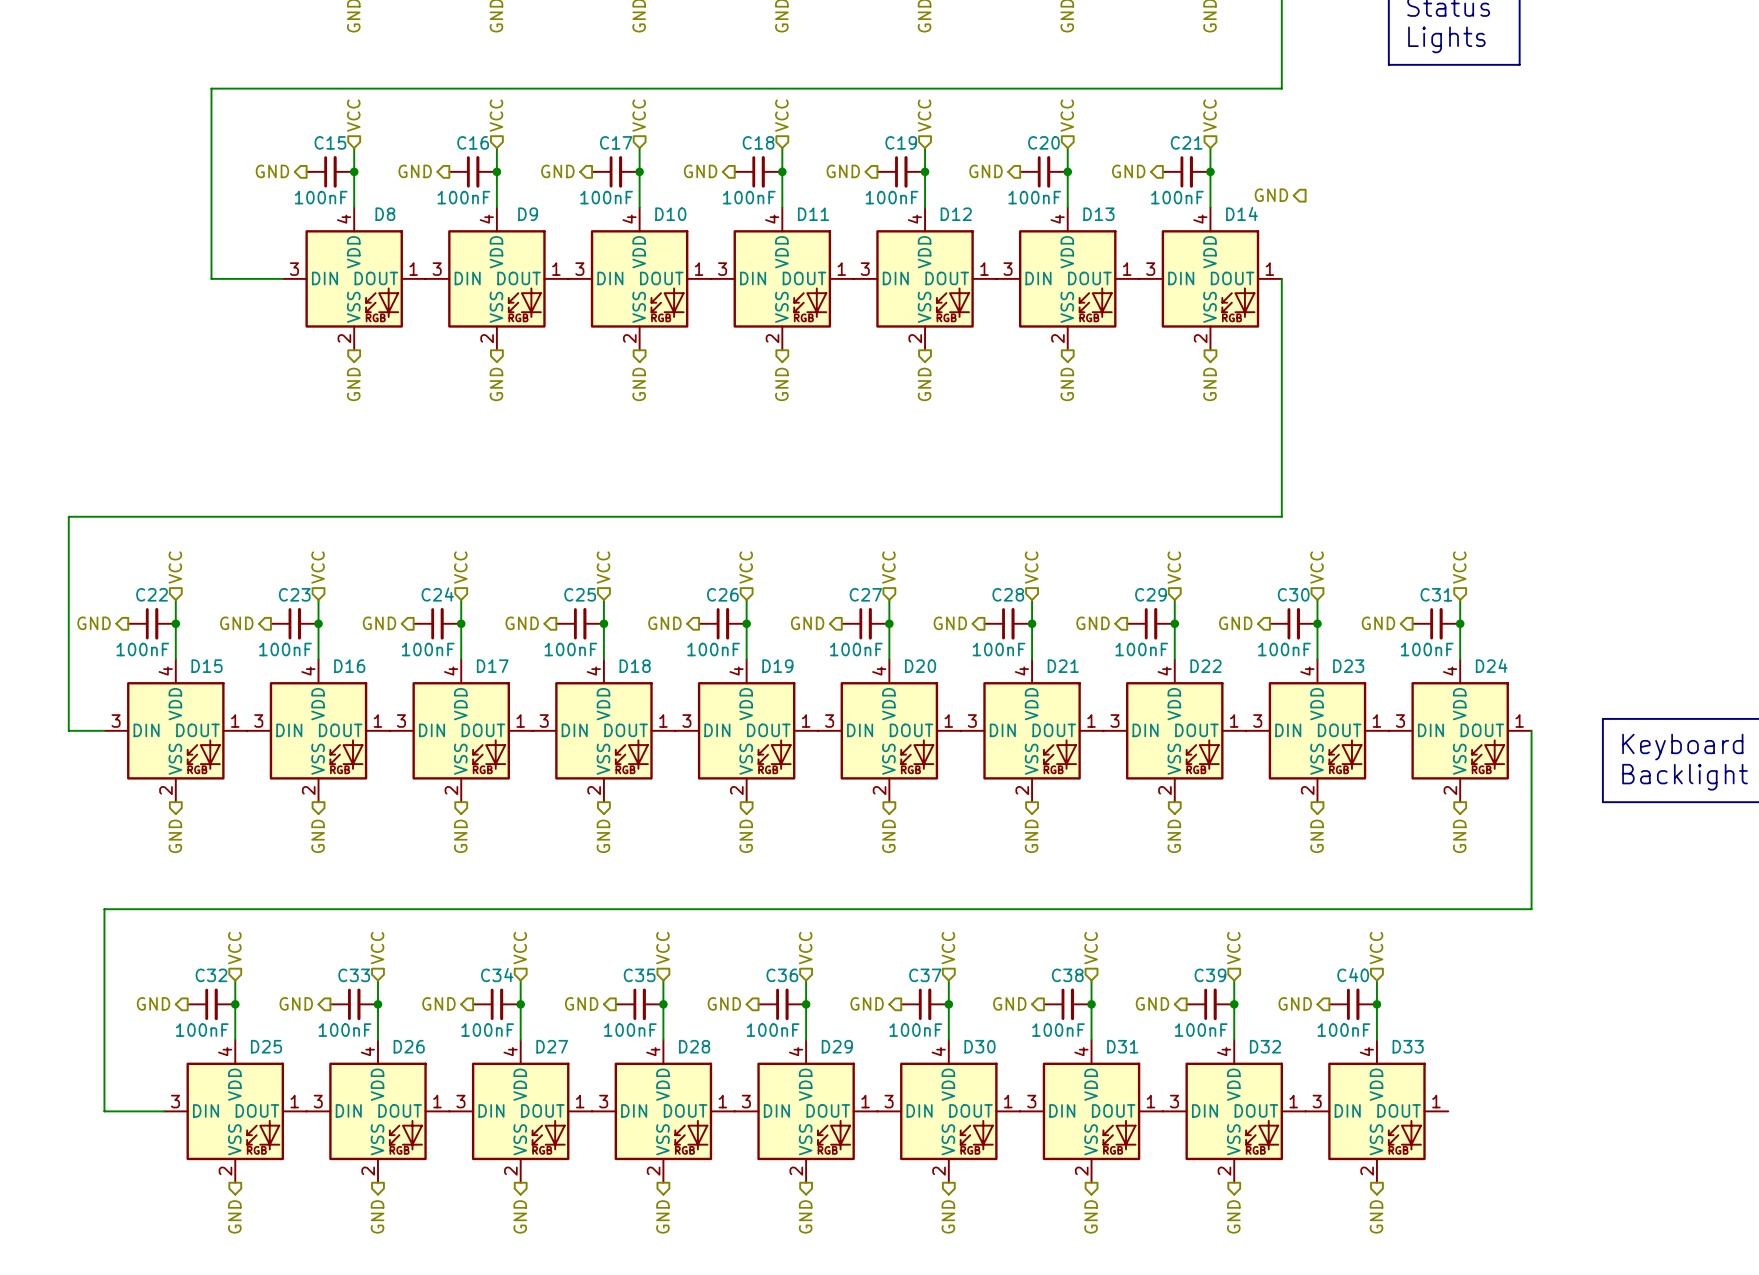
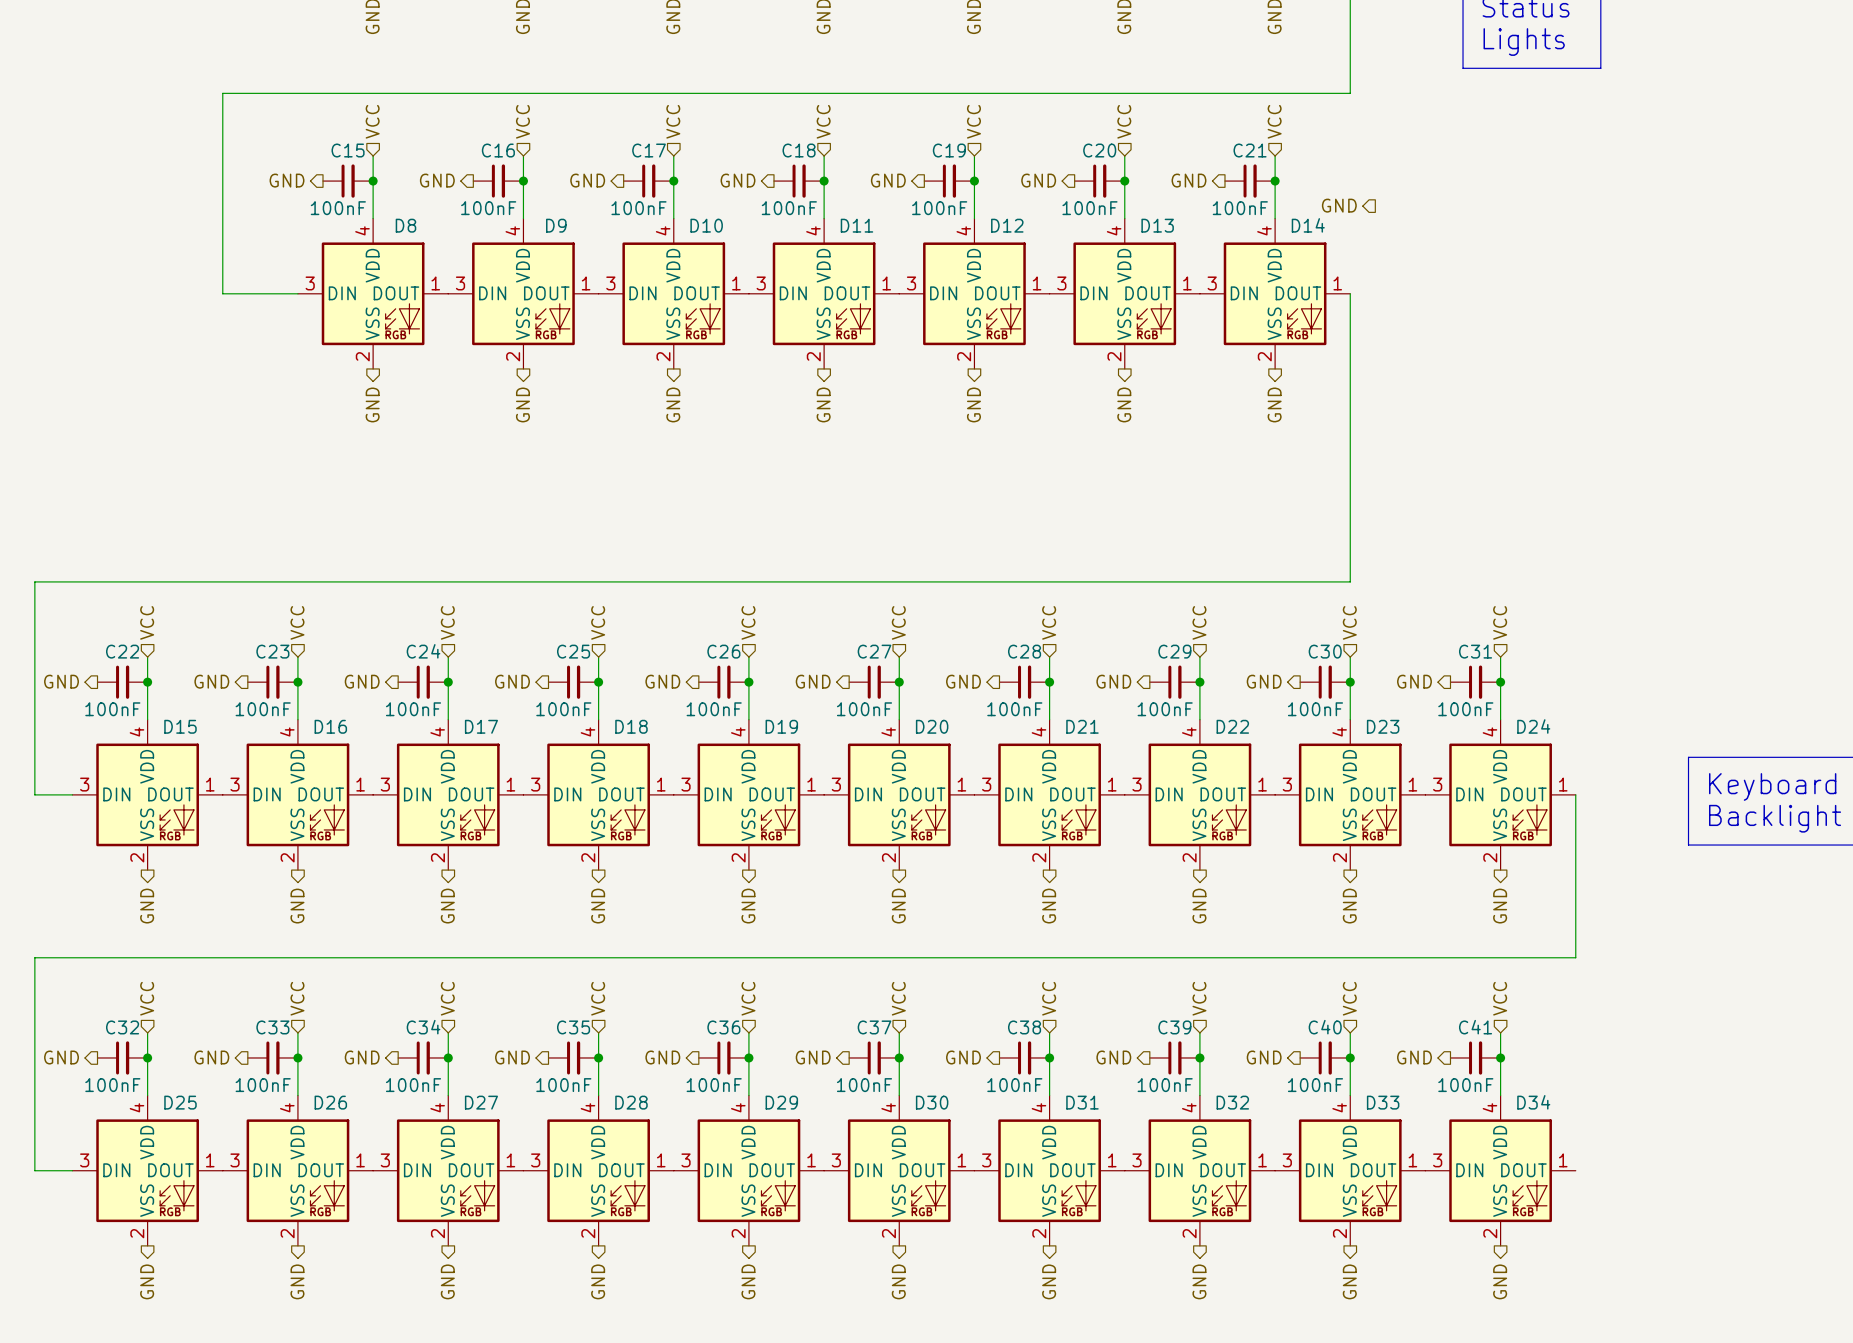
wire: (1281, 516) (68, 516) (68, 730) (104, 730) -> (1350, 544) (1350, 581) (34, 581) (34, 794) (72, 794)
hierarchical label position: VCC (175, 567) -> VCC (147, 622)
hierarchical label position: VCC (318, 567) -> VCC (297, 622)
hierarchical label position: VCC (460, 567) -> VCC (447, 622)
hierarchical label position: VCC (603, 567) -> VCC (598, 622)
hierarchical label position: VCC (746, 567) -> VCC (748, 622)
hierarchical label position: VCC (888, 567) -> VCC (898, 622)
hierarchical label position: VCC (1031, 567) -> VCC (1049, 622)
hierarchical label position: VCC (1174, 567) -> VCC (1199, 622)
hierarchical label position: VCC (1317, 567) -> VCC (1349, 622)
hierarchical label position: VCC (1459, 567) -> VCC (1500, 622)
wire: (175, 600) (175, 659) -> (147, 657) (147, 719)
wire: (318, 600) (318, 659) -> (297, 657) (297, 719)
wire: (461, 600) (461, 659) -> (448, 657) (448, 719)
wire: (603, 600) (603, 659) -> (598, 657) (598, 719)
wire: (746, 600) (746, 659) -> (748, 657) (748, 719)
wire: (889, 600) (889, 659) -> (899, 657) (899, 719)
wire: (1032, 600) (1032, 659) -> (1049, 657) (1049, 719)
wire: (1174, 600) (1174, 659) -> (1199, 657) (1199, 719)
wire: (1317, 600) (1317, 659) -> (1350, 657) (1350, 719)
wire: (1460, 600) (1460, 659) -> (1500, 657) (1500, 719)
hierarchical label position: GND (94, 623) -> GND (61, 681)
C22 position: (152, 623) -> (122, 682)
junction position: (175, 623) -> (147, 682)
hierarchical label position: GND (236, 623) -> GND (211, 681)
C23 position: (294, 623) -> (272, 682)
junction position: (318, 623) -> (297, 682)
hierarchical label position: GND (379, 623) -> GND (362, 681)
C24 position: (437, 623) -> (423, 682)
junction position: (461, 623) -> (448, 682)
hierarchical label position: GND (522, 623) -> GND (512, 681)
C25 position: (580, 623) -> (573, 682)
junction position: (603, 623) -> (598, 682)
hierarchical label position: GND (664, 623) -> GND (662, 681)
C26 position: (722, 623) -> (723, 682)
junction position: (746, 623) -> (748, 682)
hierarchical label position: GND (807, 623) -> GND (813, 681)
C27 position: (865, 623) -> (874, 682)
junction position: (889, 623) -> (899, 682)
hierarchical label position: GND (950, 623) -> GND (963, 681)
C28 position: (1008, 623) -> (1024, 682)
junction position: (1032, 623) -> (1049, 682)
hierarchical label position: GND (1093, 623) -> GND (1113, 681)
C29 position: (1150, 623) -> (1174, 682)
junction position: (1174, 623) -> (1199, 682)
hierarchical label position: GND (1235, 623) -> GND (1264, 681)
C30 position: (1293, 623) -> (1325, 682)
junction position: (1317, 623) -> (1350, 682)
hierarchical label position: GND (1378, 623) -> GND (1414, 681)
C31 position: (1436, 623) -> (1475, 682)
junction position: (1460, 623) -> (1500, 682)
D15 position: (175, 730) -> (147, 794)
D16 position: (318, 730) -> (297, 794)
D17 position: (461, 730) -> (448, 794)
D18 position: (603, 730) -> (598, 794)
D19 position: (746, 730) -> (748, 794)
D20 position: (889, 730) -> (899, 794)
D21 position: (1032, 730) -> (1049, 794)
D22 position: (1174, 730) -> (1199, 794)
D23 position: (1317, 730) -> (1350, 794)
D24 position: (1460, 730) -> (1500, 794)
wire: (1531, 730) (1531, 909) (1495, 909) -> (1575, 794) (1575, 957)
hierarchical label position: GND (175, 836) -> GND (147, 906)
hierarchical label position: GND (318, 836) -> GND (297, 906)
hierarchical label position: GND (460, 836) -> GND (447, 906)
hierarchical label position: GND (603, 836) -> GND (598, 906)
hierarchical label position: GND (746, 836) -> GND (748, 906)
hierarchical label position: GND (888, 836) -> GND (898, 906)
hierarchical label position: GND (1031, 836) -> GND (1049, 906)
hierarchical label position: GND (1174, 836) -> GND (1199, 906)
hierarchical label position: GND (1317, 836) -> GND (1349, 906)
hierarchical label position: GND (1459, 836) -> GND (1500, 906)
wire: (104, 909) (104, 1111) (163, 1111) -> (110, 957) (34, 957) (34, 1170) (72, 1170)
hierarchical label: none -> VCC (147, 998)
hierarchical label: VCC (234, 948) -> none
hierarchical label: none -> VCC (297, 998)
hierarchical label: VCC (377, 948) -> none
hierarchical label: none -> VCC (447, 998)
hierarchical label: VCC (520, 948) -> none
hierarchical label: none -> VCC (598, 998)
hierarchical label: VCC (662, 948) -> none
hierarchical label: none -> VCC (748, 998)
hierarchical label: VCC (805, 948) -> none
hierarchical label: none -> VCC (898, 998)
hierarchical label: VCC (948, 948) -> none
hierarchical label: none -> VCC (1049, 998)
hierarchical label: VCC (1091, 948) -> none
hierarchical label: none -> VCC (1199, 998)
hierarchical label: VCC (1233, 948) -> none
hierarchical label: none -> VCC (1349, 998)
hierarchical label: VCC (1376, 948) -> none
hierarchical label: none -> VCC (1500, 998)
wire: none -> (147, 1032) (147, 1095)
wire: (235, 980) (235, 1040) -> (297, 1032) (297, 1095)
wire: (377, 980) (377, 1040) -> (448, 1032) (448, 1095)
wire: (520, 980) (520, 1040) -> (598, 1032) (598, 1095)
wire: (663, 980) (663, 1040) -> (748, 1032) (748, 1095)
wire: (806, 980) (806, 1040) -> (899, 1032) (899, 1095)
wire: (948, 980) (948, 1040) -> (1049, 1032) (1049, 1095)
wire: (1091, 980) (1091, 1040) -> (1199, 1032) (1199, 1095)
wire: (1234, 980) (1234, 1040) -> (1350, 1032) (1350, 1095)
wire: (1376, 980) (1376, 1040) -> (1500, 1032) (1500, 1095)
hierarchical label: none -> GND (61, 1057)
hierarchical label: GND (153, 1003) -> none
hierarchical label: none -> GND (211, 1057)
hierarchical label: GND (296, 1003) -> none
hierarchical label: none -> GND (362, 1057)
hierarchical label: GND (438, 1003) -> none
hierarchical label: none -> GND (512, 1057)
hierarchical label: GND (581, 1003) -> none
hierarchical label: none -> GND (662, 1057)
hierarchical label: GND (724, 1003) -> none
hierarchical label: none -> GND (813, 1057)
hierarchical label: GND (867, 1003) -> none
hierarchical label: none -> GND (963, 1057)
hierarchical label: GND (1009, 1003) -> none
hierarchical label: none -> GND (1113, 1057)
hierarchical label: GND (1152, 1003) -> none
hierarchical label: none -> GND (1264, 1057)
hierarchical label: GND (1295, 1003) -> none
hierarchical label: none -> GND (1414, 1057)
junction: none -> (147, 1057)
C32 position: (211, 1004) -> (122, 1057)
junction: (235, 1004) -> none
junction: none -> (297, 1057)
C33 position: (354, 1004) -> (272, 1057)
junction: (377, 1004) -> none
junction: none -> (448, 1057)
C34 position: (496, 1004) -> (423, 1057)
junction: (520, 1004) -> none
junction: none -> (598, 1057)
C35 position: (639, 1004) -> (573, 1057)
junction: (663, 1004) -> none
junction: none -> (748, 1057)
C36 position: (782, 1004) -> (723, 1057)
junction: (806, 1004) -> none
junction: none -> (899, 1057)
C37 position: (925, 1004) -> (874, 1057)
junction: (948, 1004) -> none
junction: none -> (1049, 1057)
C38 position: (1067, 1004) -> (1024, 1057)
junction: (1091, 1004) -> none
junction: none -> (1199, 1057)
C39 position: (1210, 1004) -> (1174, 1057)
junction: (1234, 1004) -> none
junction: none -> (1350, 1057)
C40 position: (1353, 1004) -> (1325, 1057)
junction: (1376, 1004) -> none
C41: none -> 100nF (1475, 1057)
junction: none -> (1500, 1057)
D25 position: (235, 1111) -> (147, 1170)
D26 position: (377, 1111) -> (297, 1170)
D27 position: (520, 1111) -> (448, 1170)
D28 position: (663, 1111) -> (598, 1170)
D29 position: (806, 1111) -> (748, 1170)
D30 position: (948, 1111) -> (899, 1170)
D31 position: (1091, 1111) -> (1049, 1170)
D32 position: (1234, 1111) -> (1199, 1170)
D33 position: (1376, 1111) -> (1350, 1170)
D34: none -> (1500, 1170)
hierarchical label: none -> GND (147, 1281)
hierarchical label: GND (234, 1216) -> none
hierarchical label: none -> GND (297, 1281)
hierarchical label: GND (377, 1216) -> none
hierarchical label: none -> GND (447, 1281)
hierarchical label: GND (520, 1216) -> none
hierarchical label: none -> GND (598, 1281)
hierarchical label: GND (662, 1216) -> none
hierarchical label: none -> GND (748, 1281)
hierarchical label: GND (805, 1216) -> none
hierarchical label: none -> GND (898, 1281)
hierarchical label: GND (948, 1216) -> none
hierarchical label: none -> GND (1049, 1281)
hierarchical label: GND (1091, 1216) -> none
hierarchical label: none -> GND (1199, 1281)
hierarchical label: GND (1233, 1216) -> none
hierarchical label: none -> GND (1349, 1281)
hierarchical label: GND (1376, 1216) -> none
hierarchical label: none -> GND (1500, 1281)

